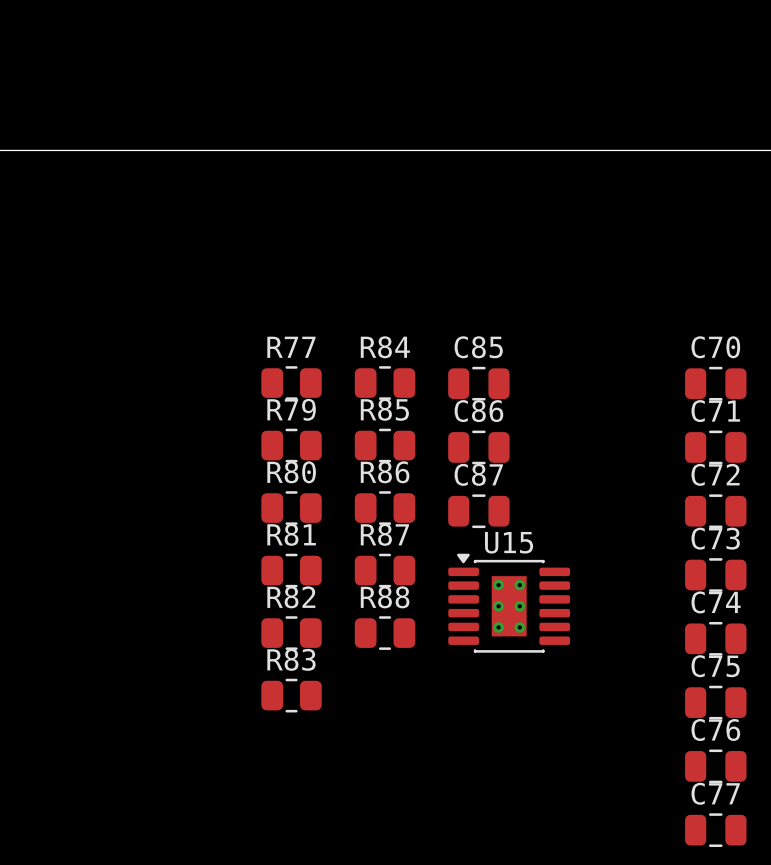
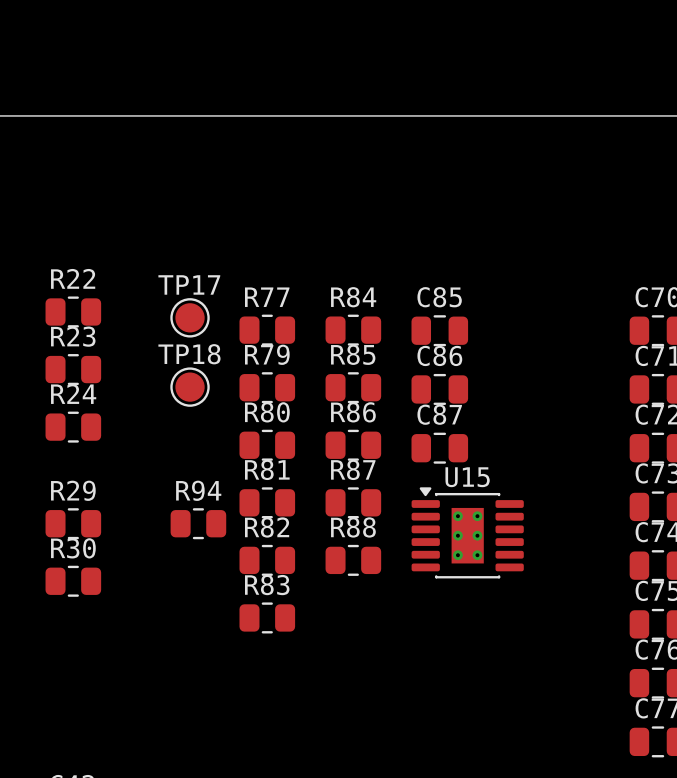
R22: none -> (73, 311)
TP17: none -> (190, 317)
R23: none -> (73, 369)
TP18: none -> (190, 387)
R24: none -> (73, 427)
R29: none -> (73, 523)
R94: none -> (198, 523)
R30: none -> (73, 581)

